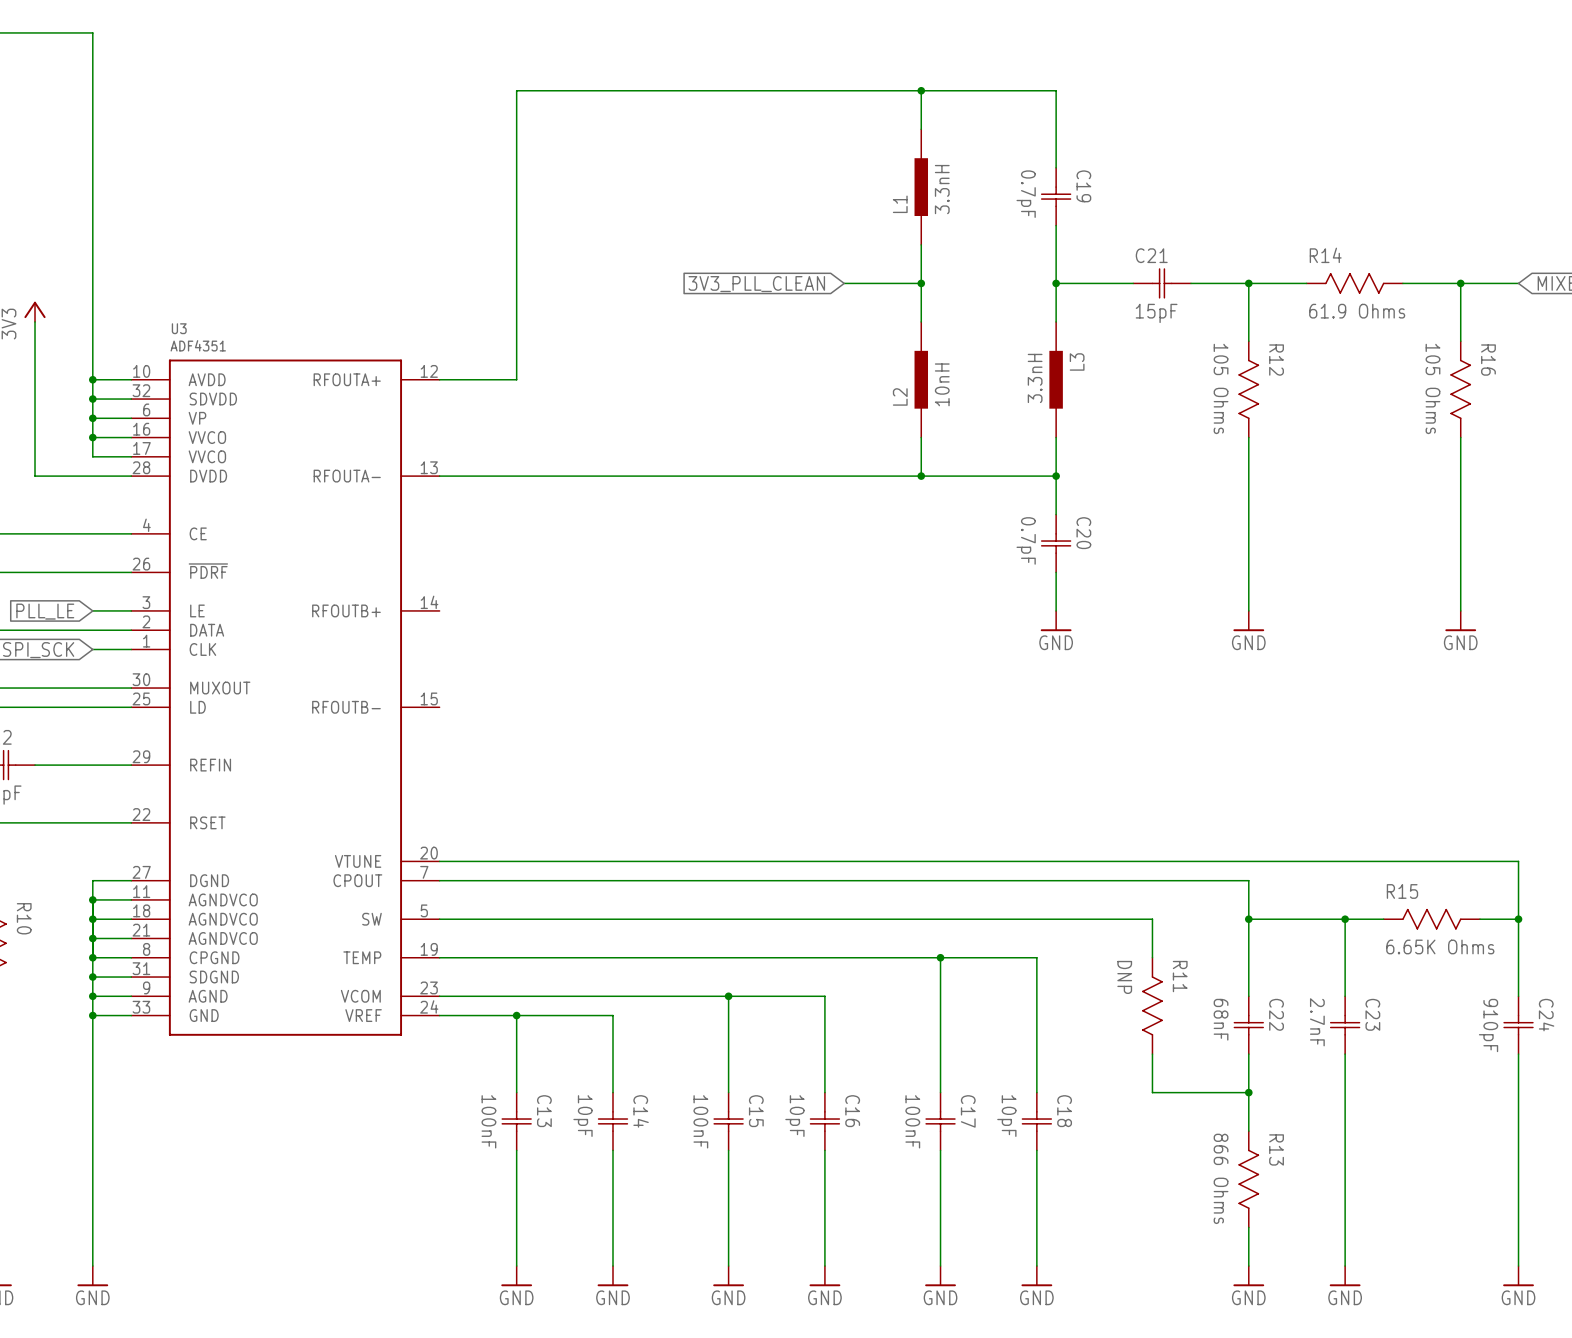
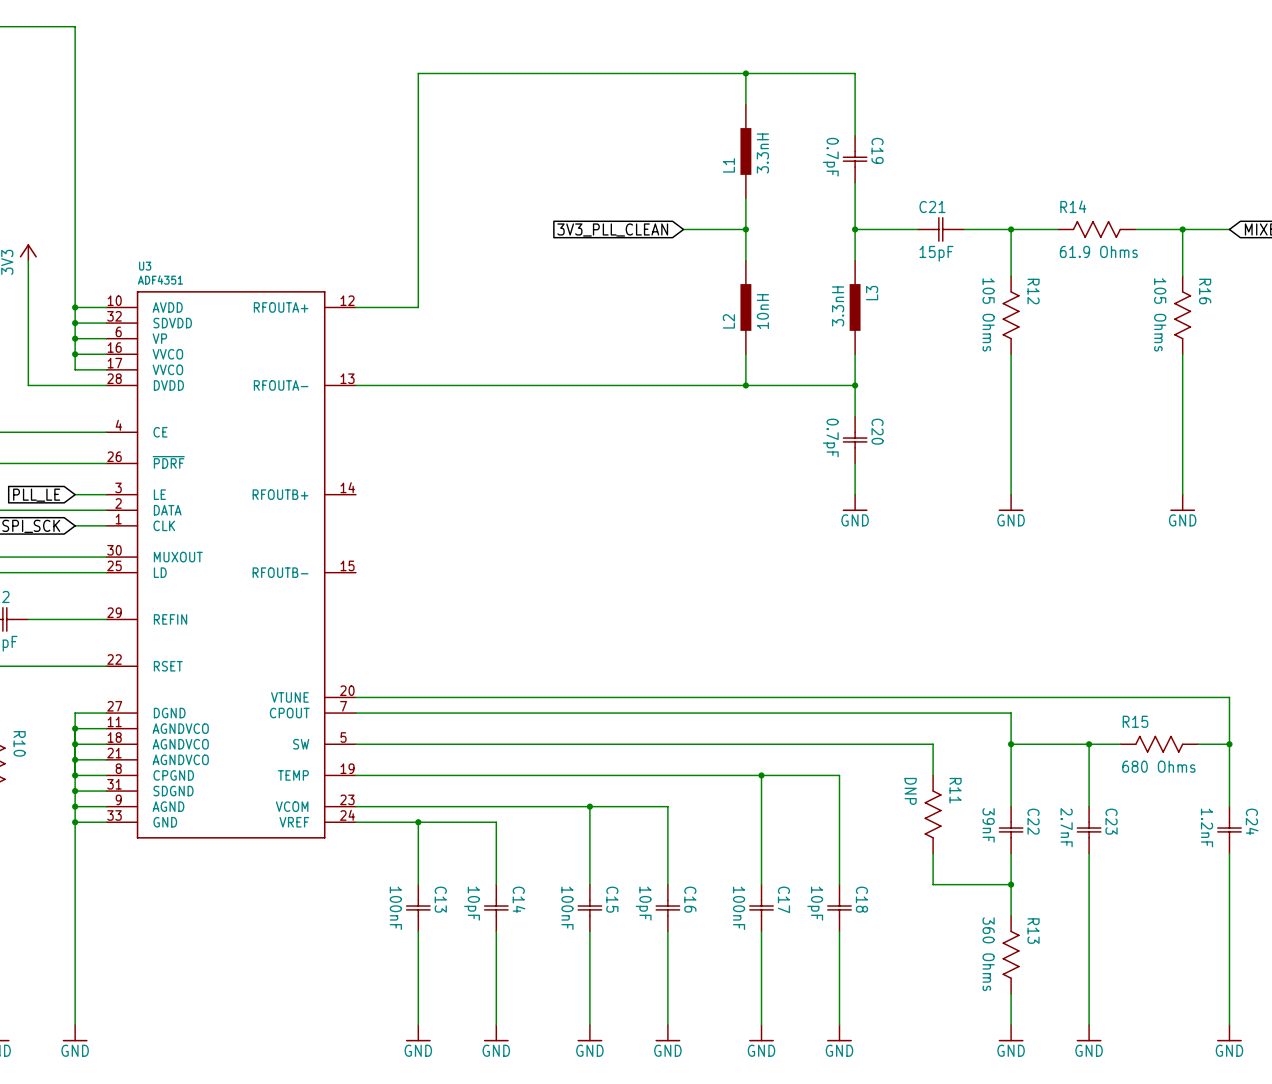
R15 value: 6.65K Ohms (1440, 946) -> 680 Ohms (1158, 766)
C22 value: 68nF (1221, 1019) -> 39nF (988, 825)
C24 value: 910pF (1488, 1025) -> 1.2nF (1207, 827)
R13 value: 866 Ohms (1221, 1178) -> 360 Ohms (988, 954)

